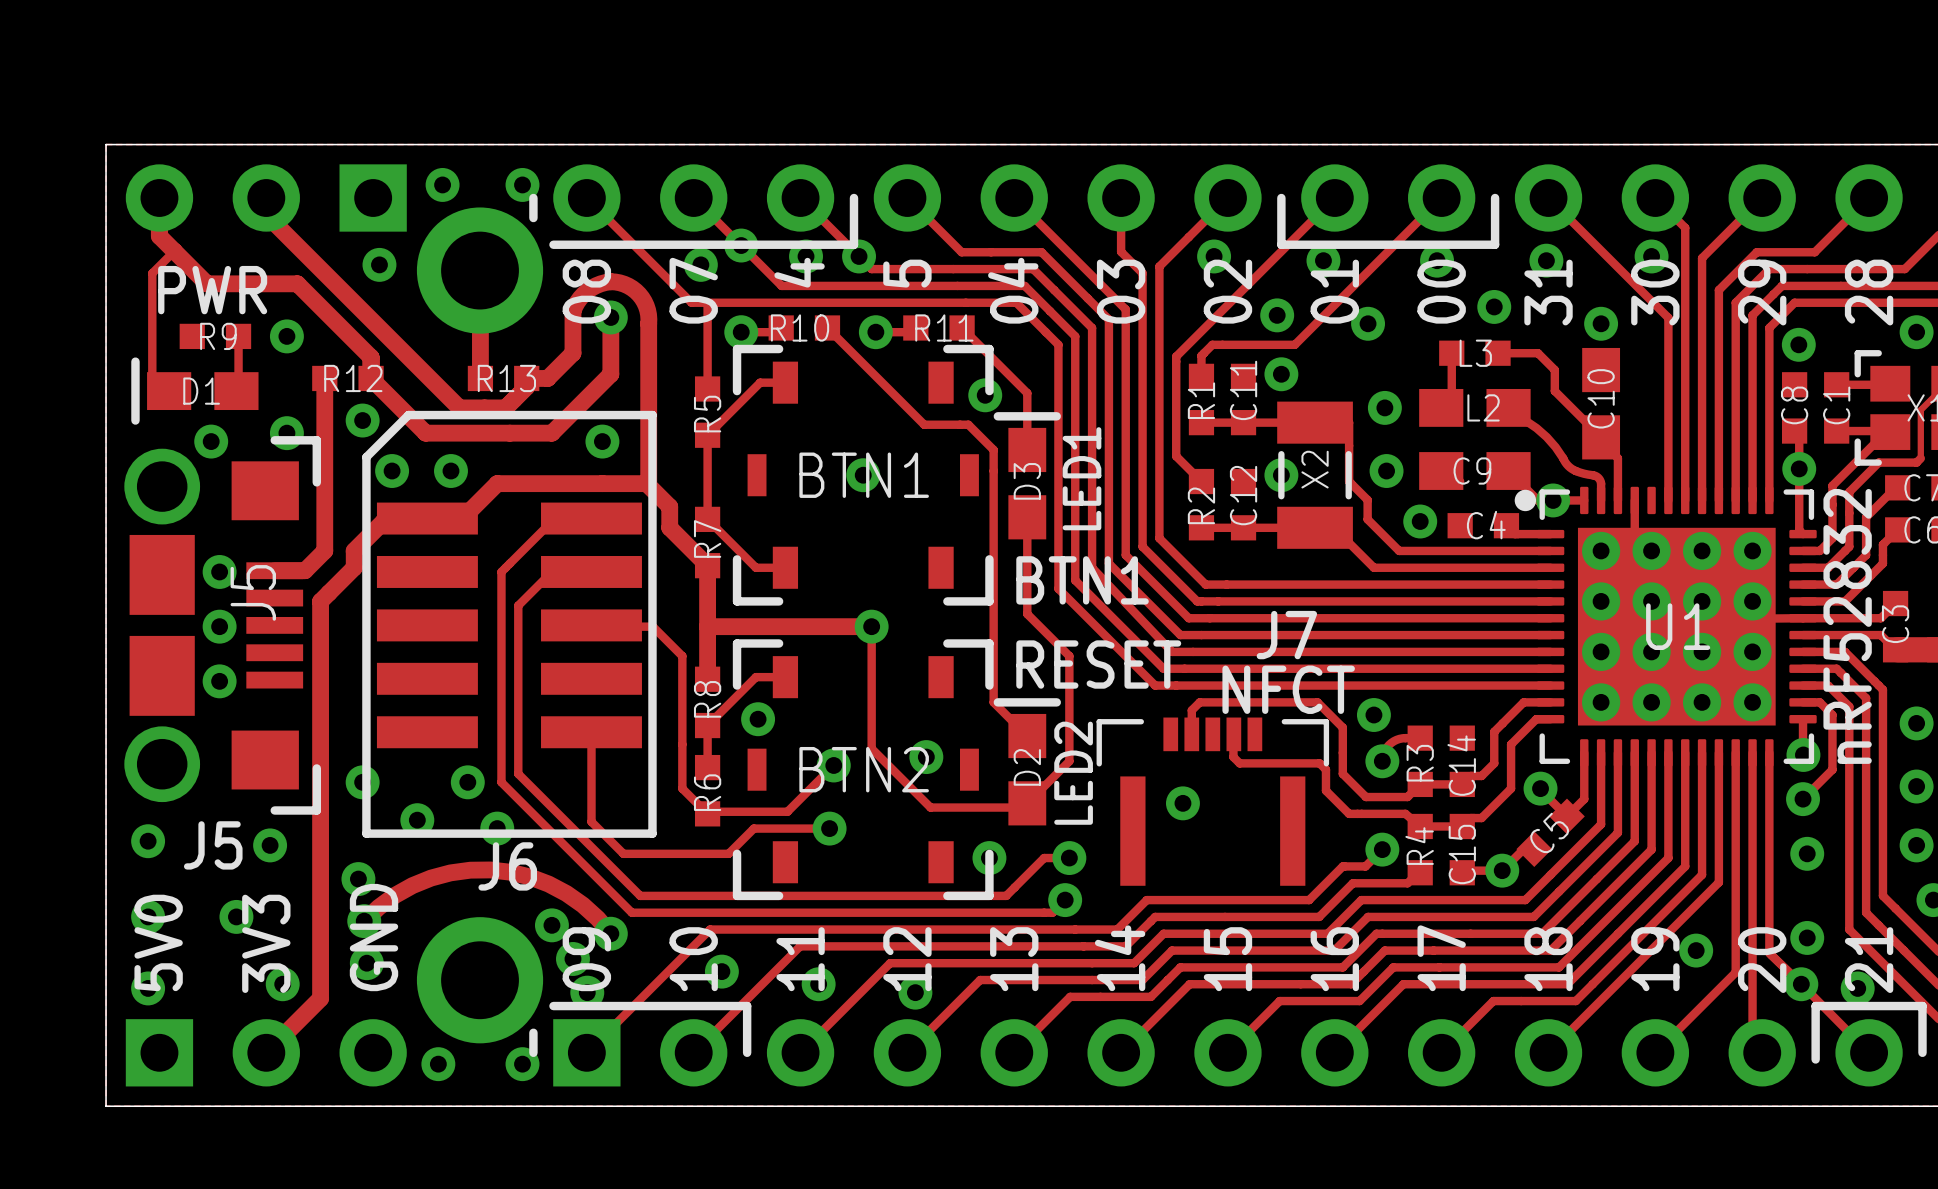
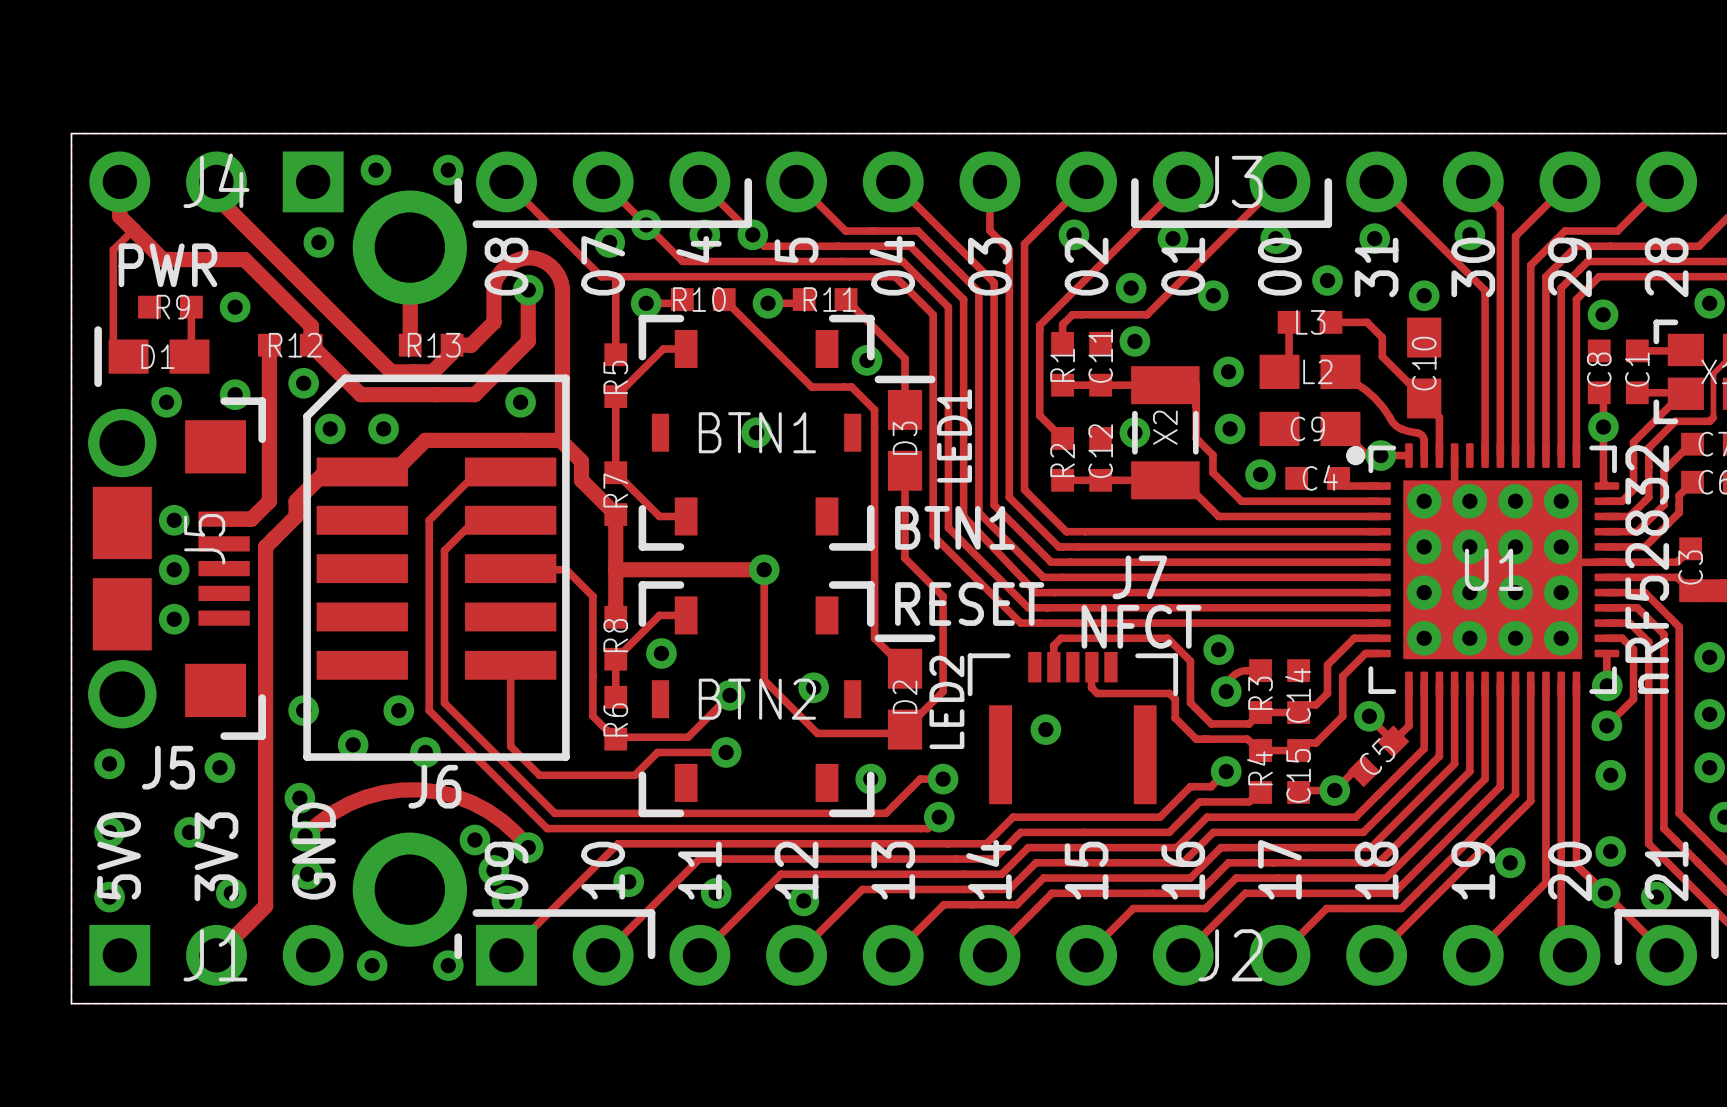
J4 name: none -> J4 (216, 180)
J3 name: none -> J3 (1230, 181)
J1 name: none -> J1 (215, 955)
J2 name: none -> J2 (1230, 955)

